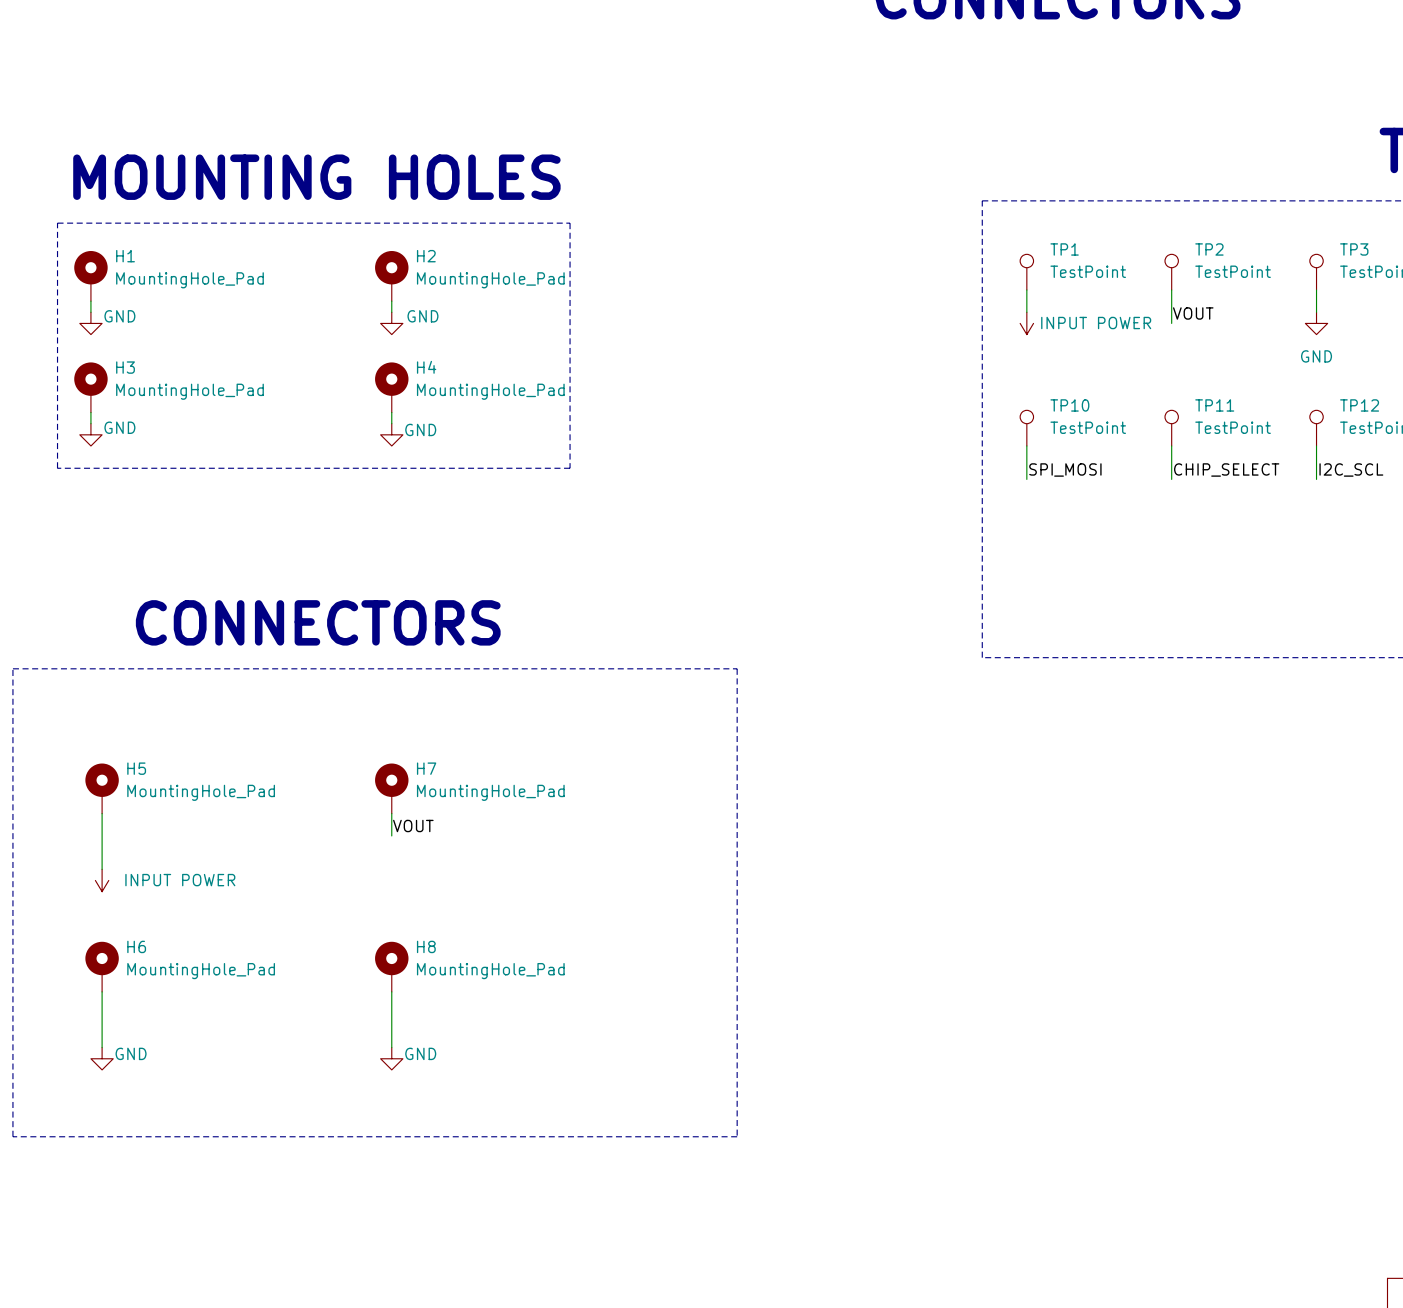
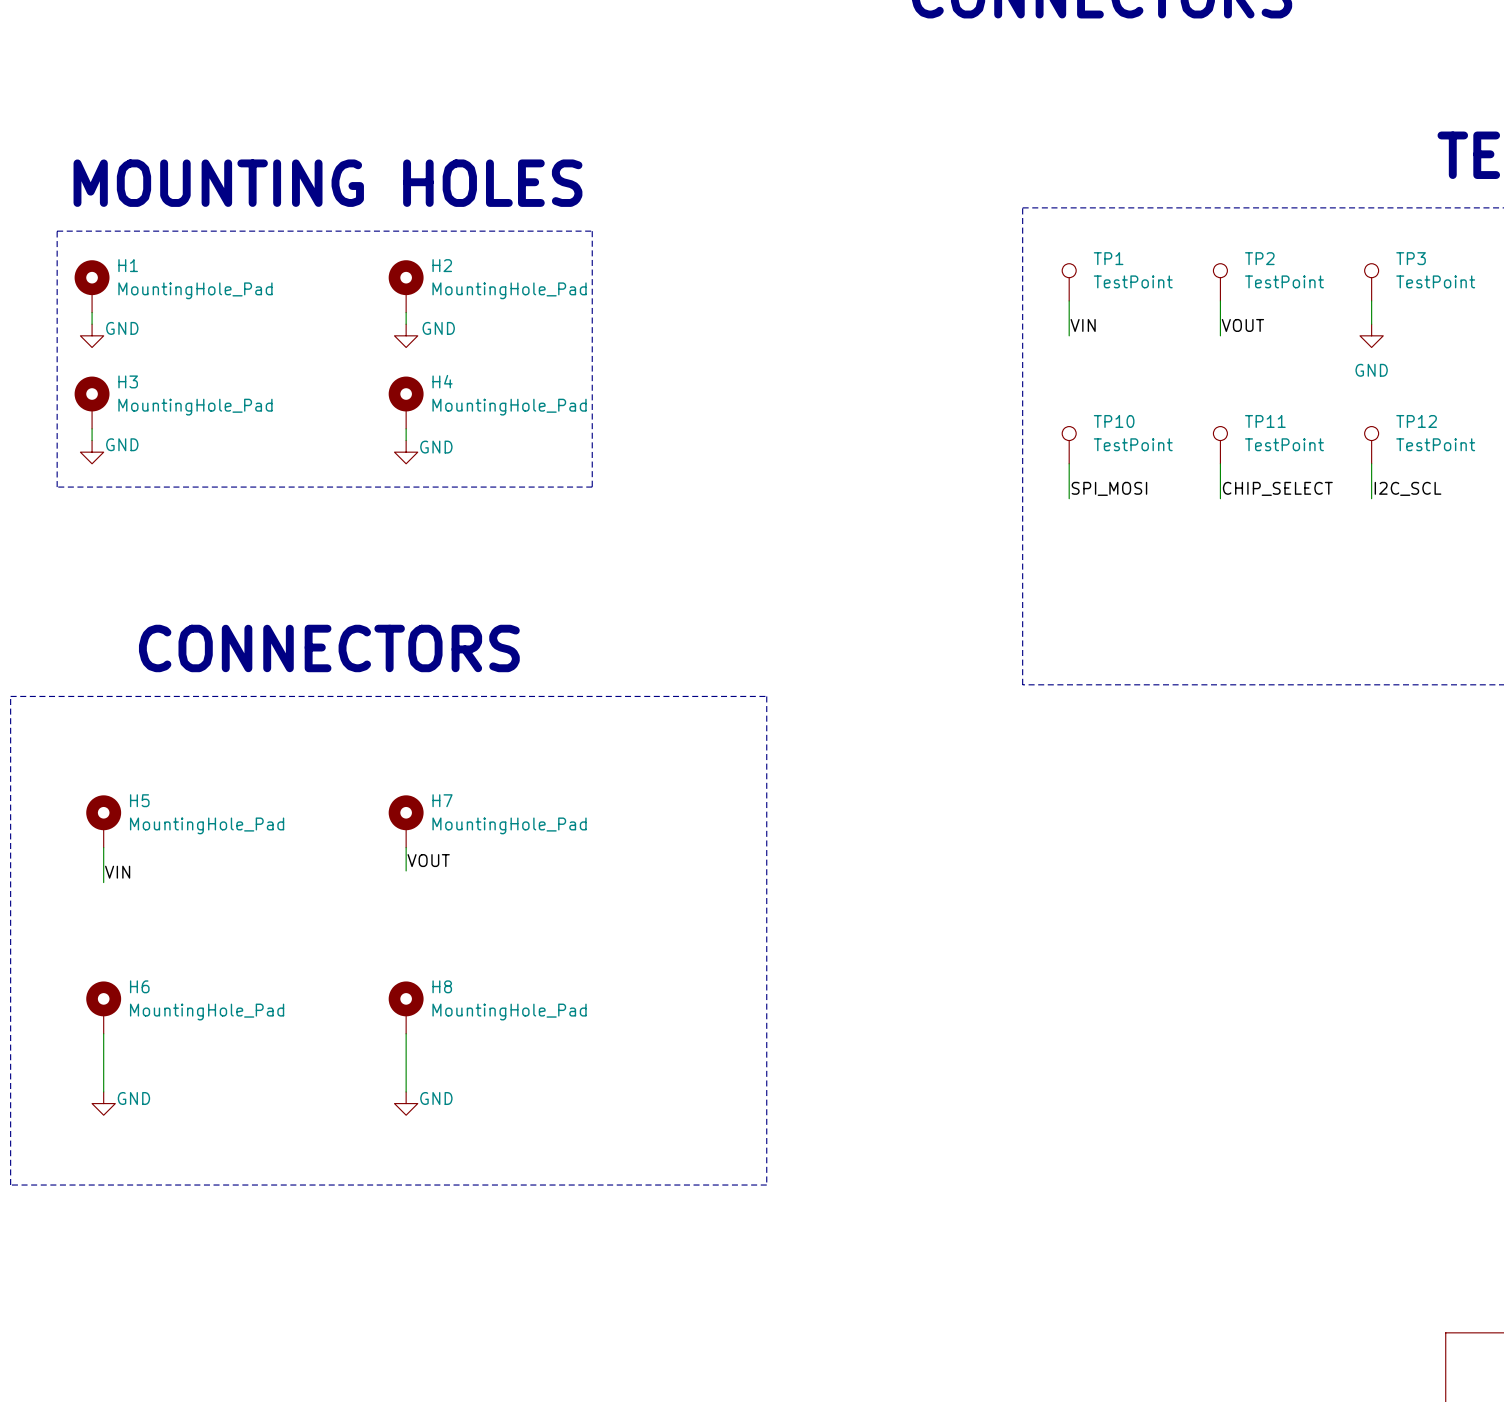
label: none -> VIN (1083, 325)
power symbol: INPUT POWER (1026, 323) -> none
label: none -> VIN (117, 872)
wire: (102, 847) (102, 869) -> none
power symbol: INPUT POWER (102, 880) -> none

